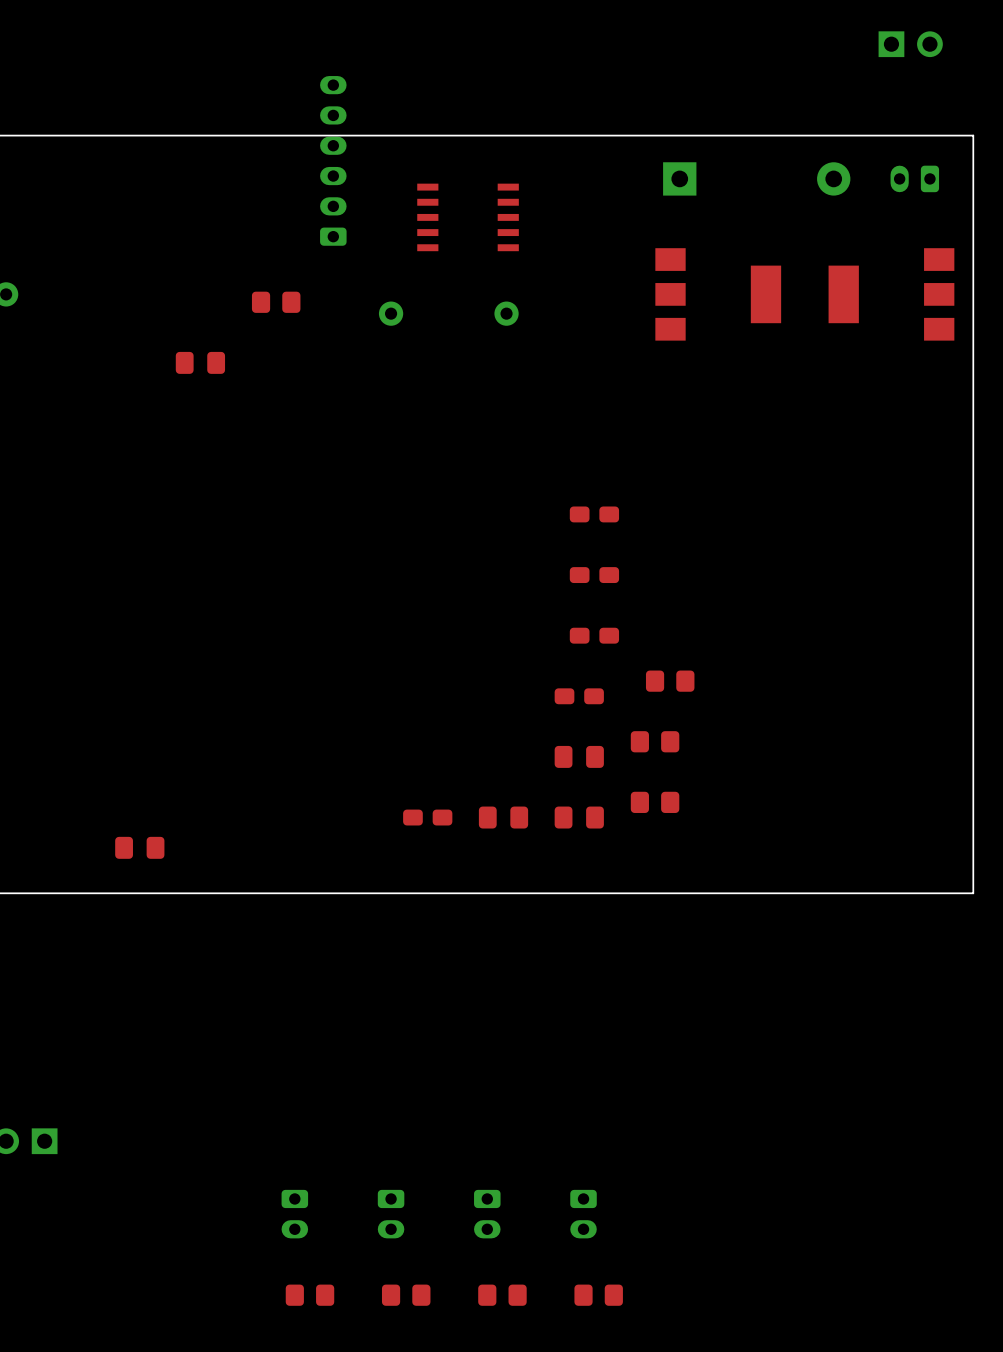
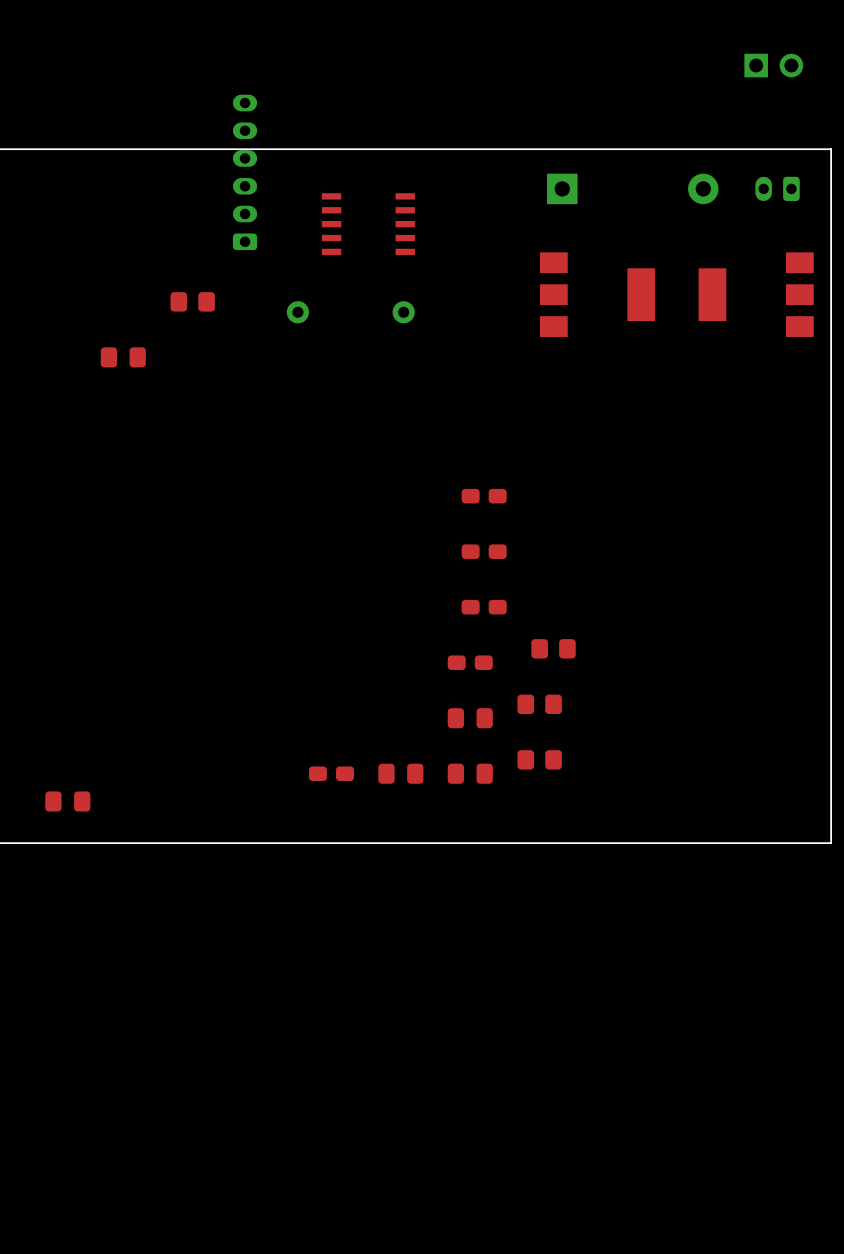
part: (294, 1214) -> none
part: (391, 1214) -> none
part: (487, 1214) -> none
part: (583, 1214) -> none
part: (309, 1295) -> none
part: (406, 1295) -> none
part: (502, 1295) -> none
part: (598, 1295) -> none

